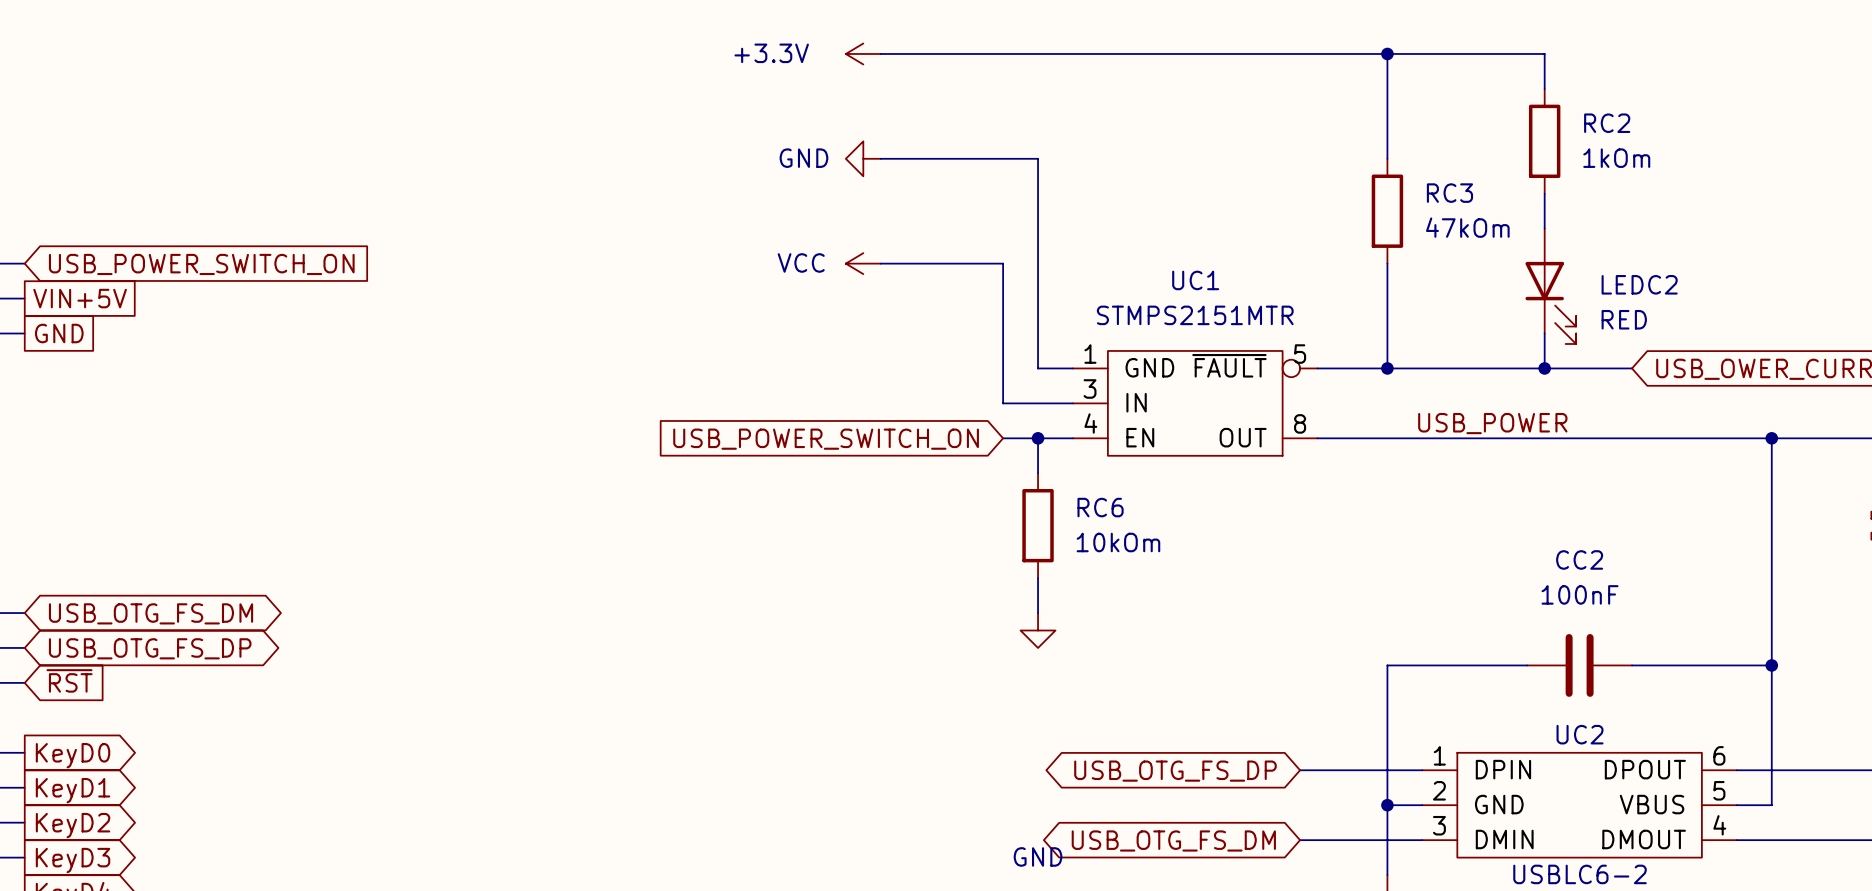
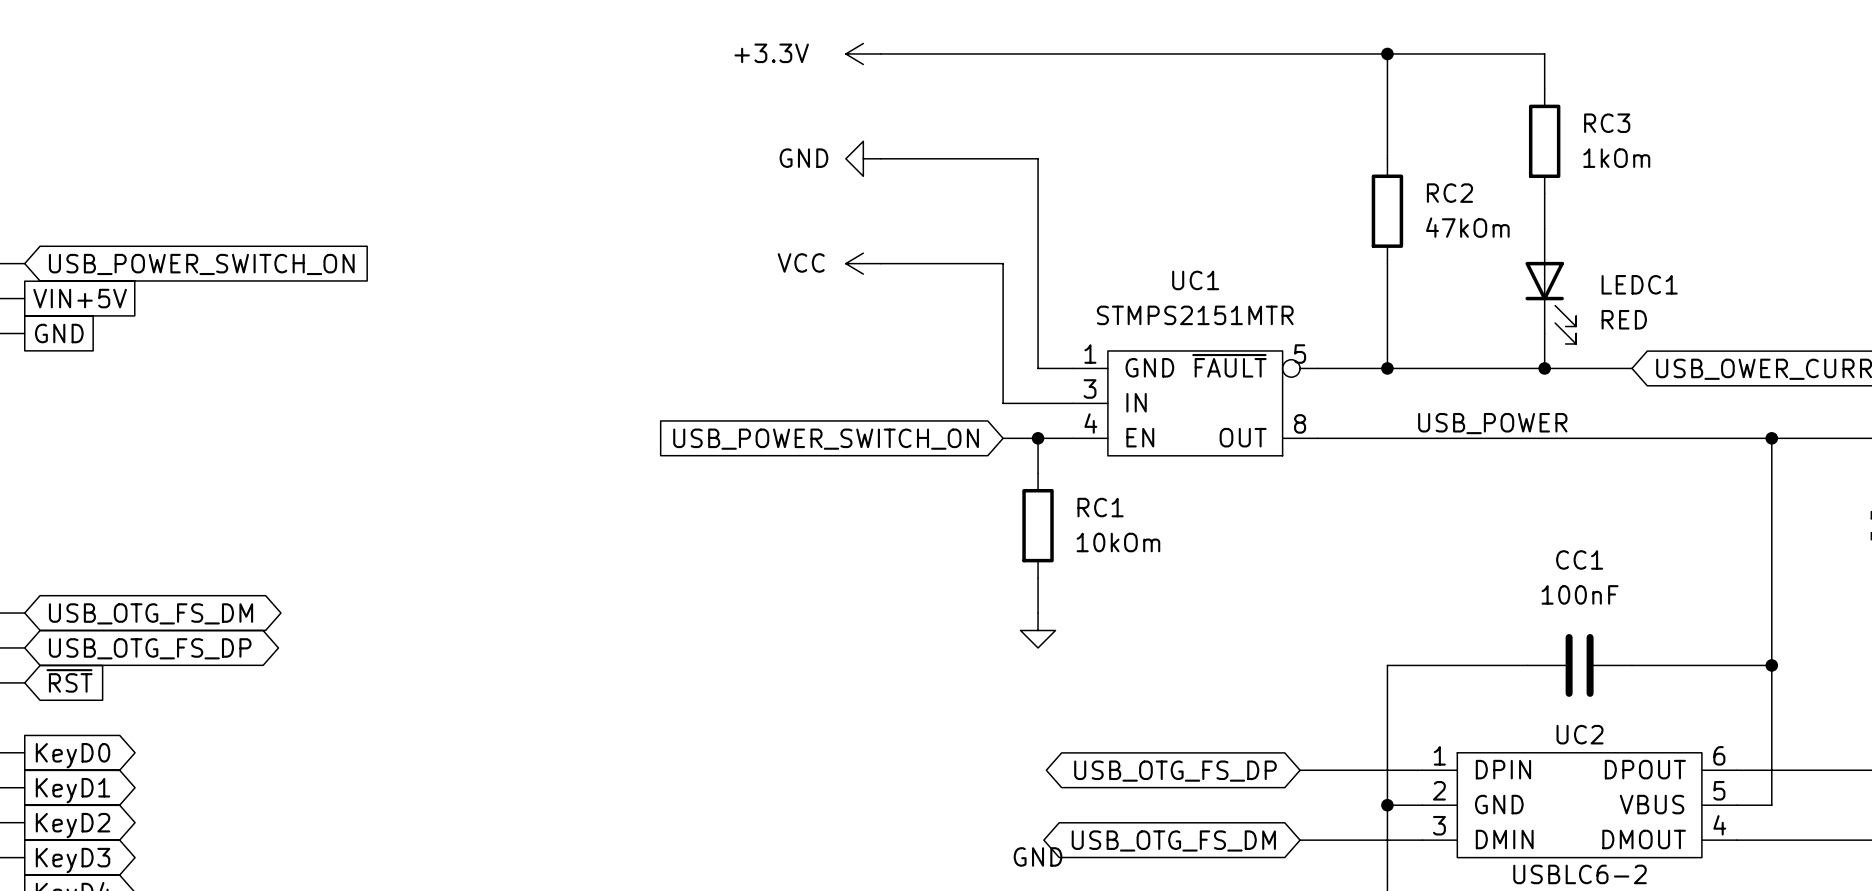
RC2 name: RC2 (1607, 123) -> RC3 (1607, 123)
RC3 name: RC3 (1449, 193) -> RC2 (1449, 193)
LEDC2 name: LEDC2 (1639, 284) -> LEDC1 (1639, 284)
RC6 name: RC6 (1100, 507) -> RC1 (1100, 507)
CC2 name: CC2 (1579, 559) -> CC1 (1579, 559)

